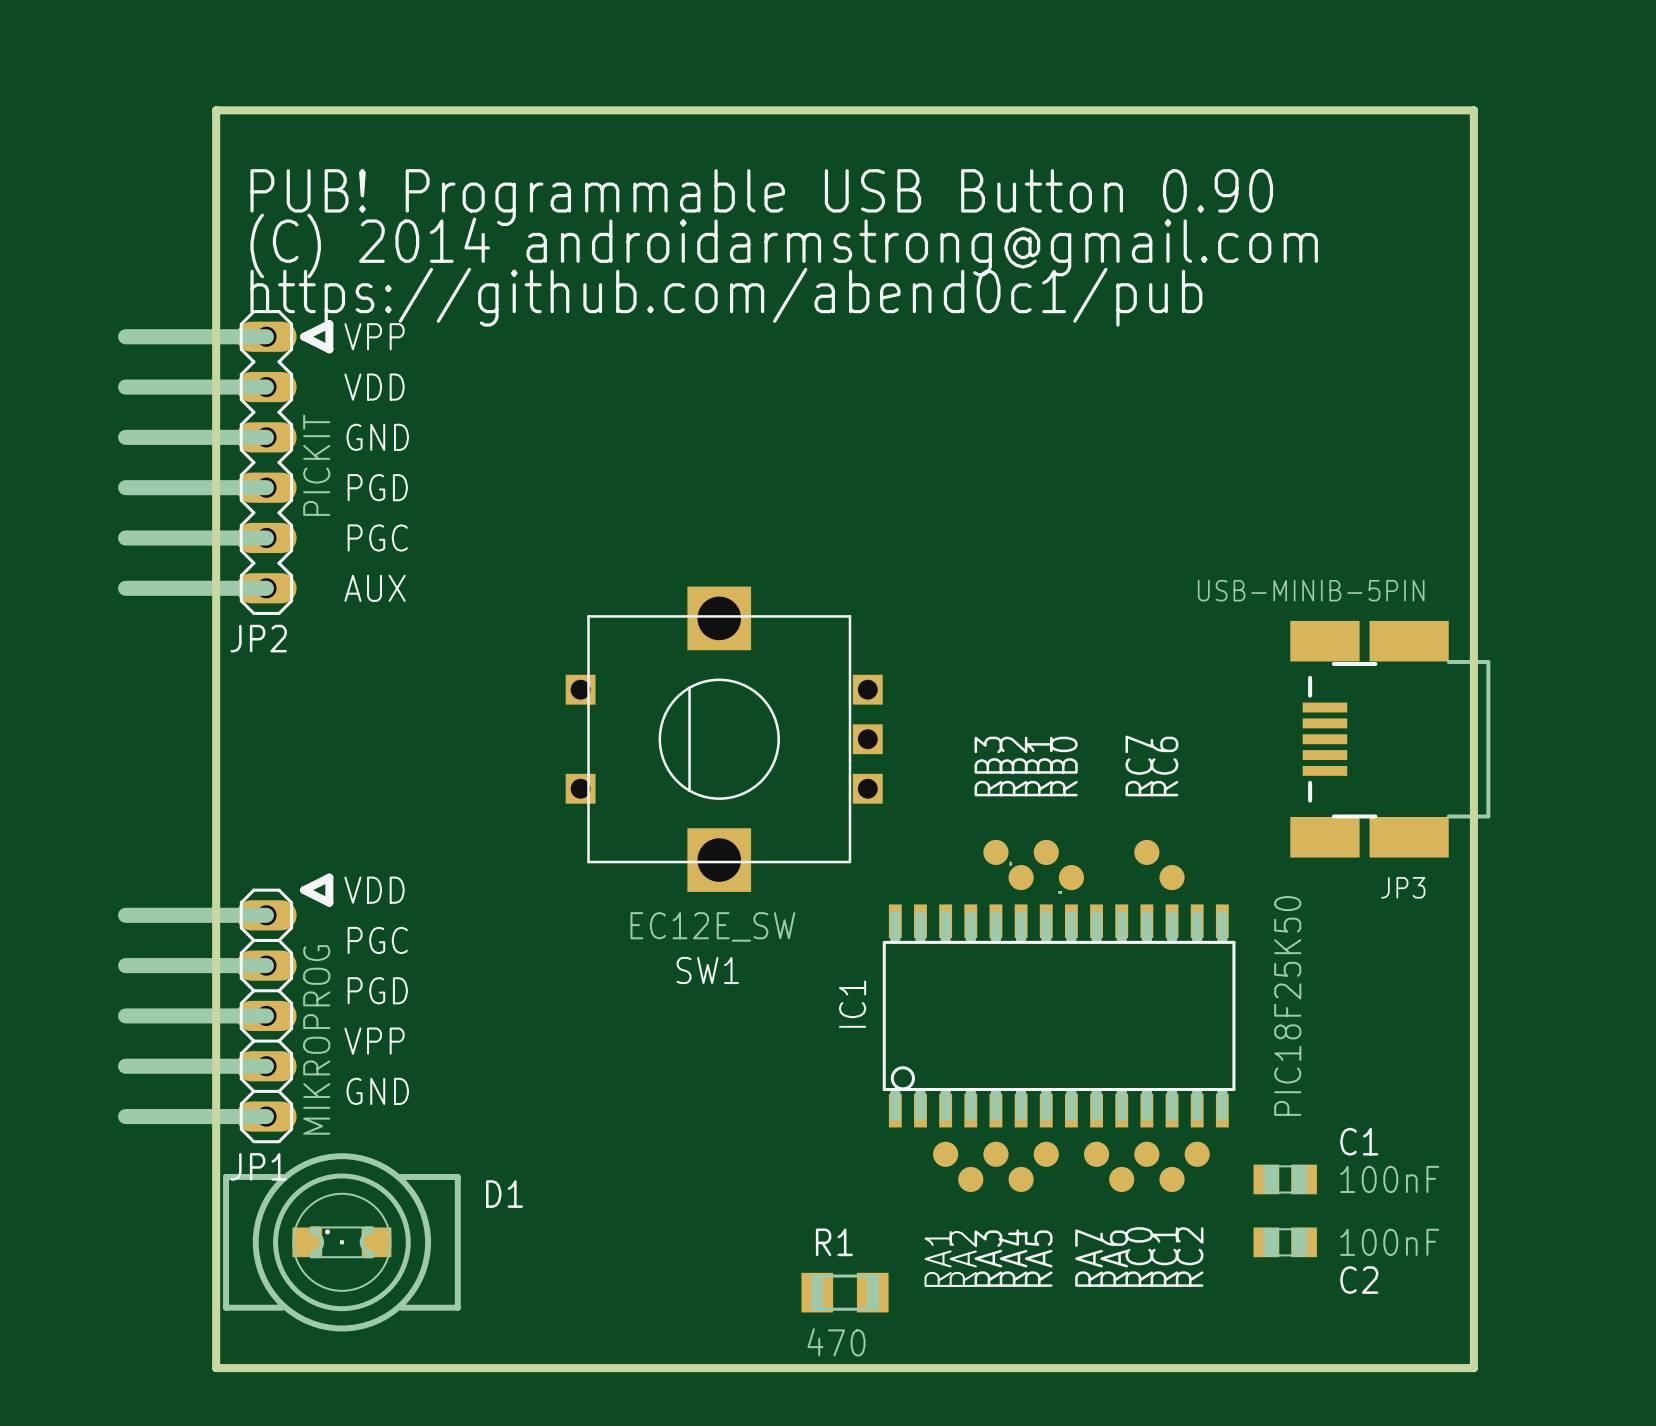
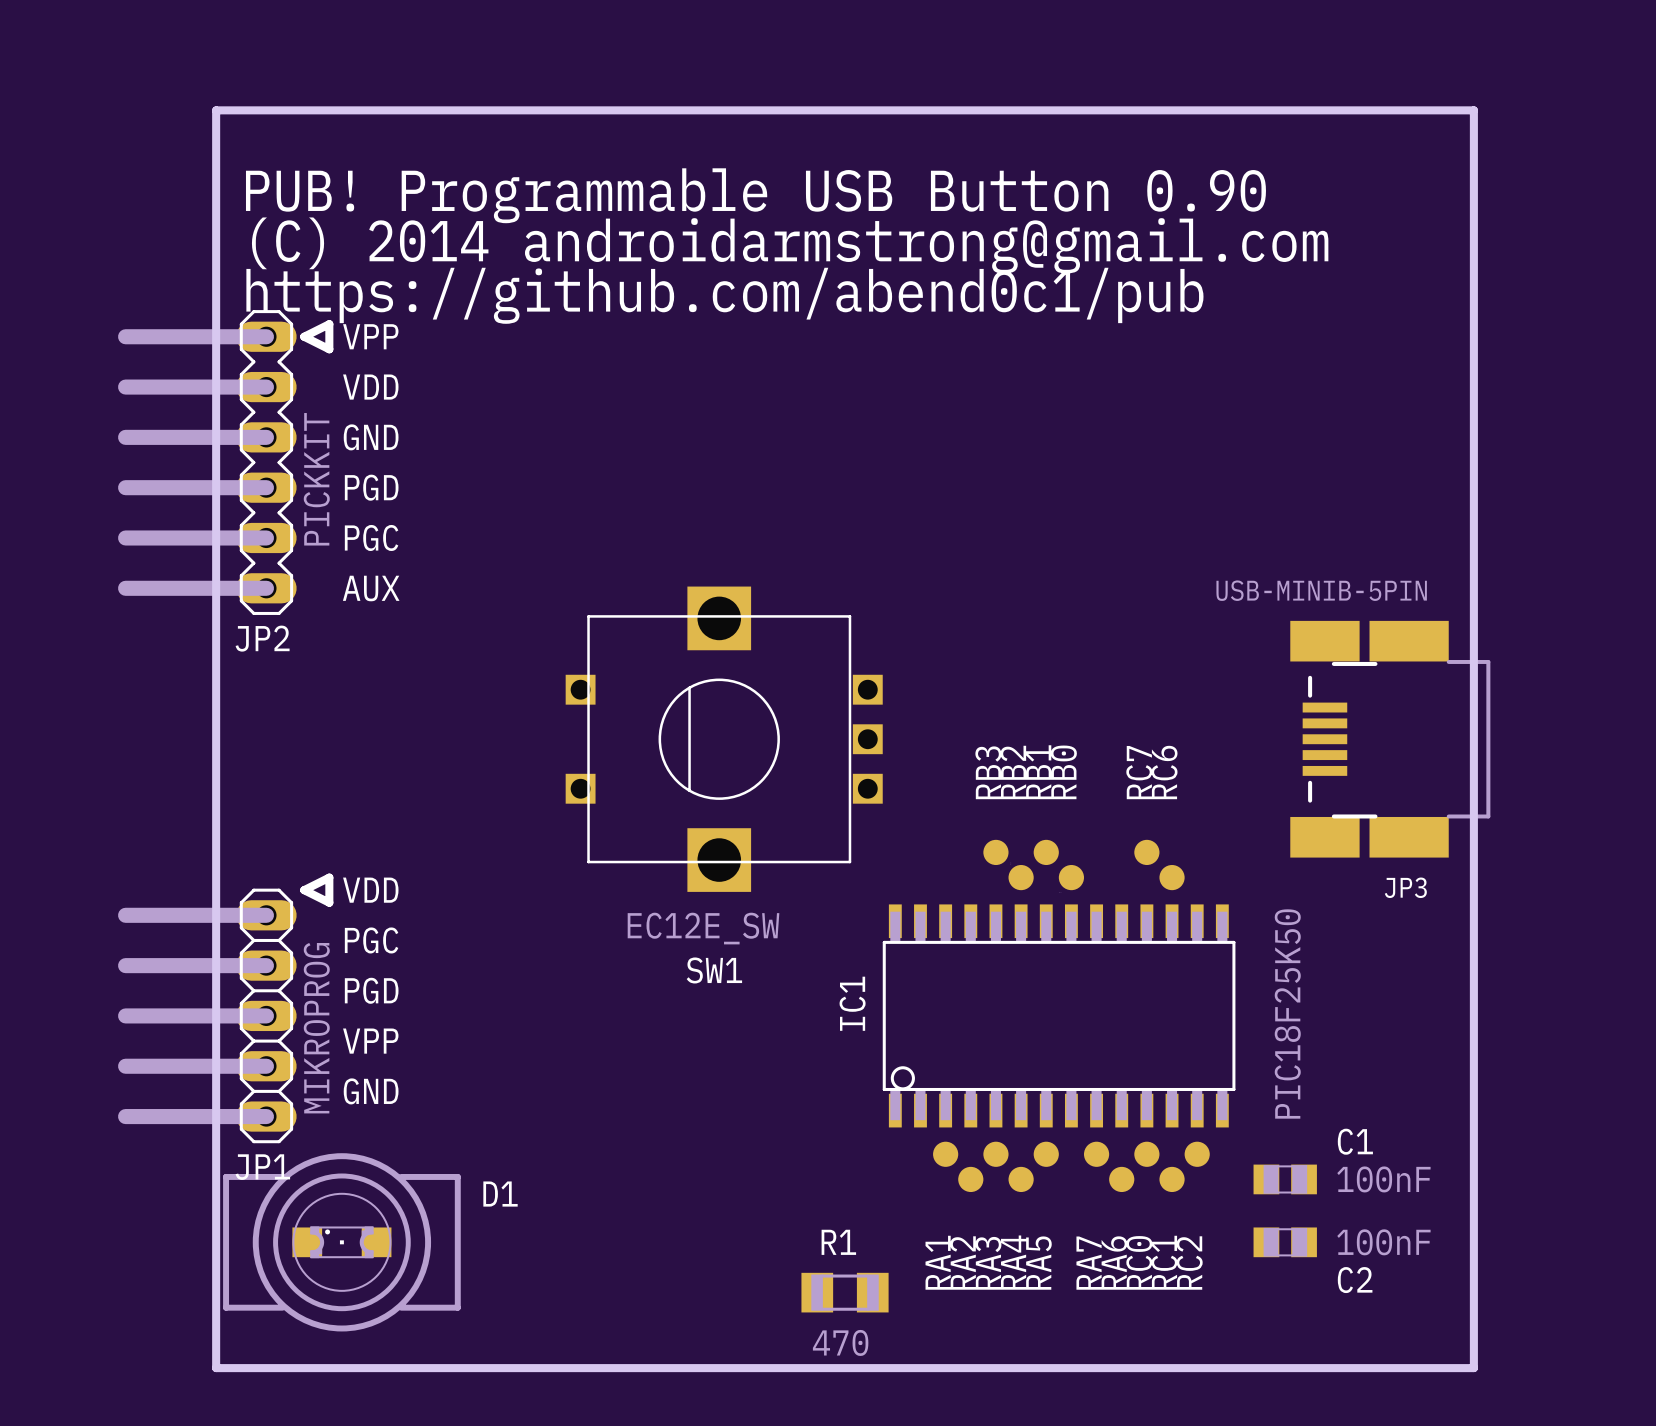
JP2 value: PICKIT (316, 465) -> PICKKIT (316, 479)

